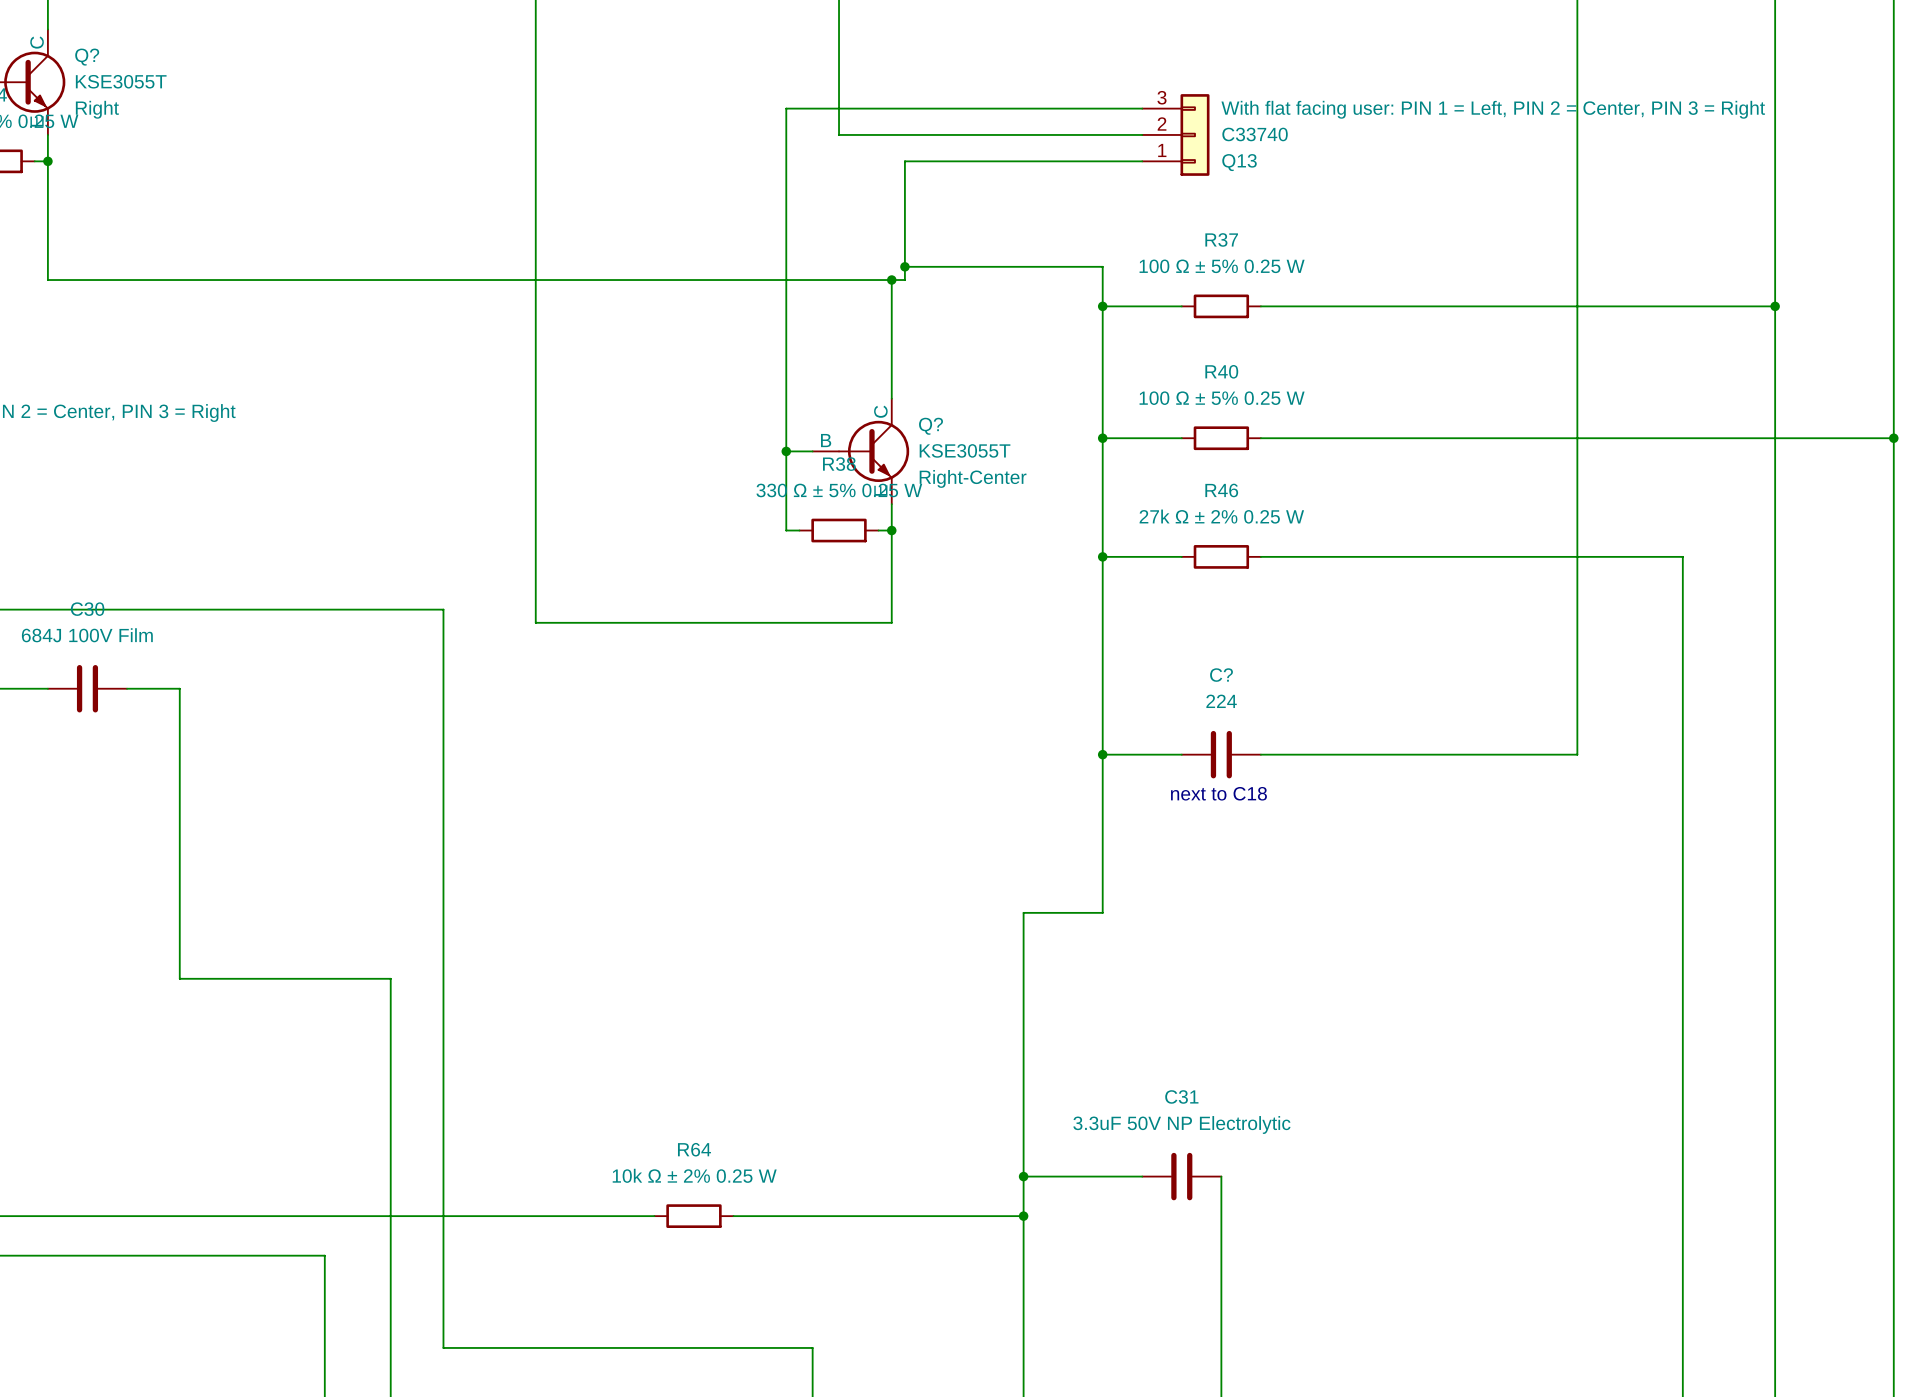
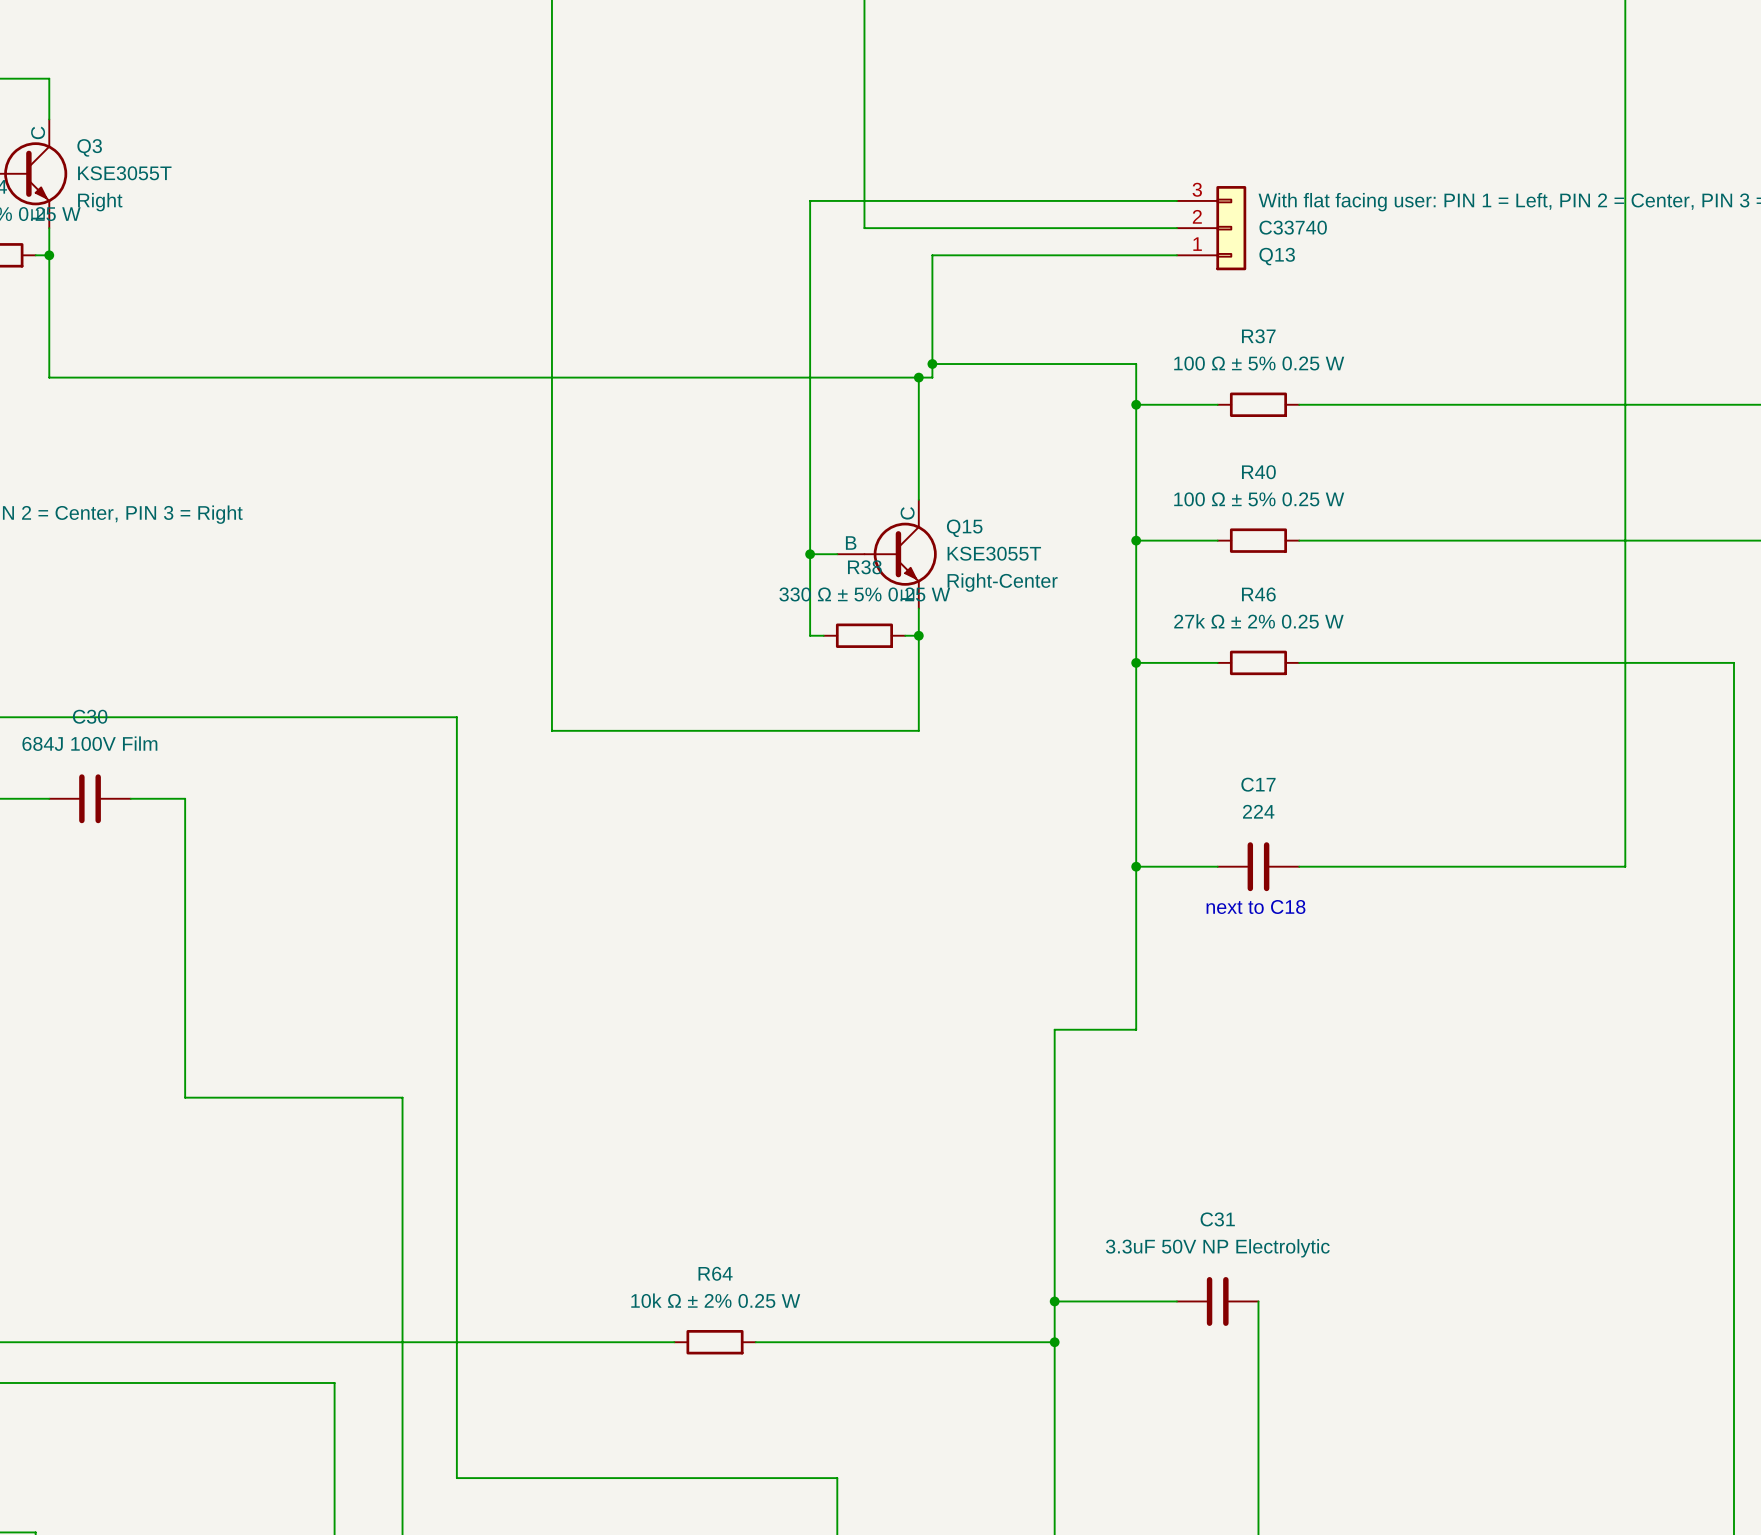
Q? name: Q? (87, 57) -> Q3 (89, 147)
Q? name: Q? (931, 426) -> Q15 (964, 528)
C? name: C? (1221, 675) -> C17 (1258, 784)

